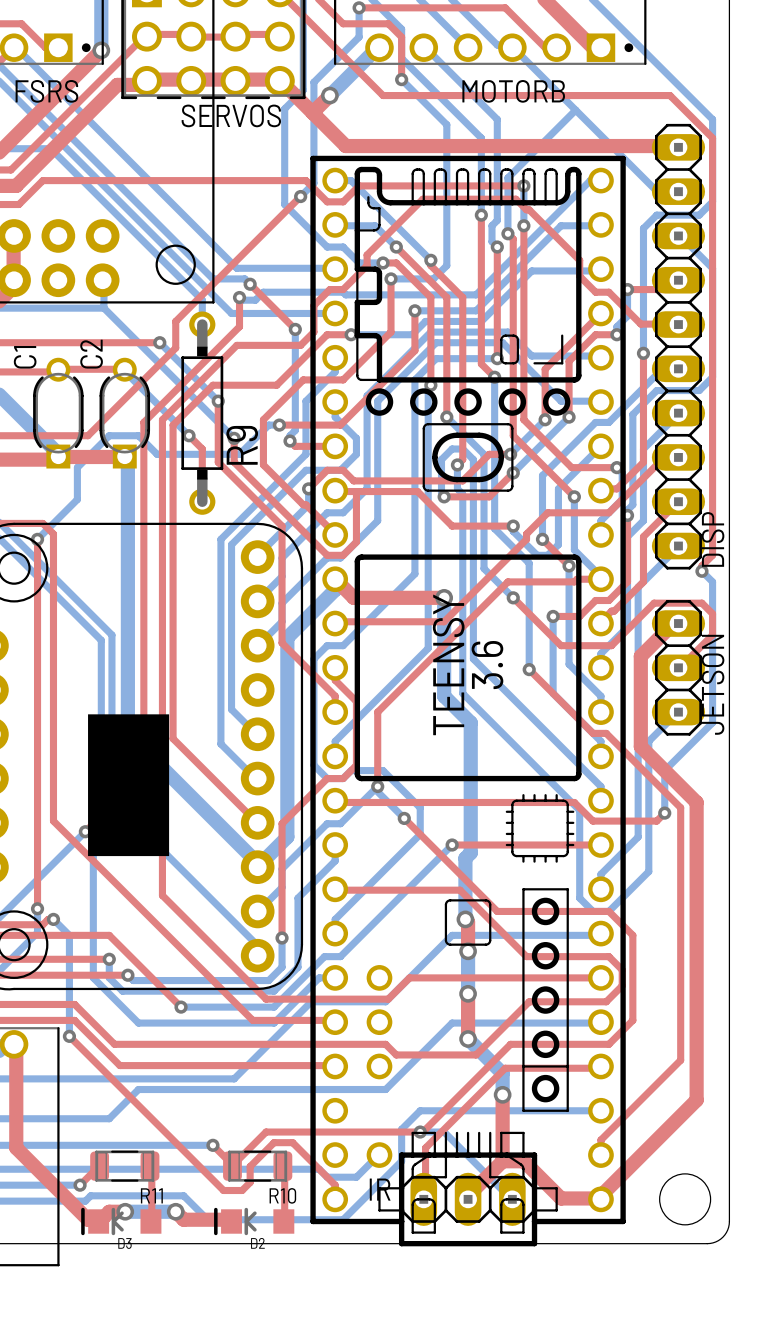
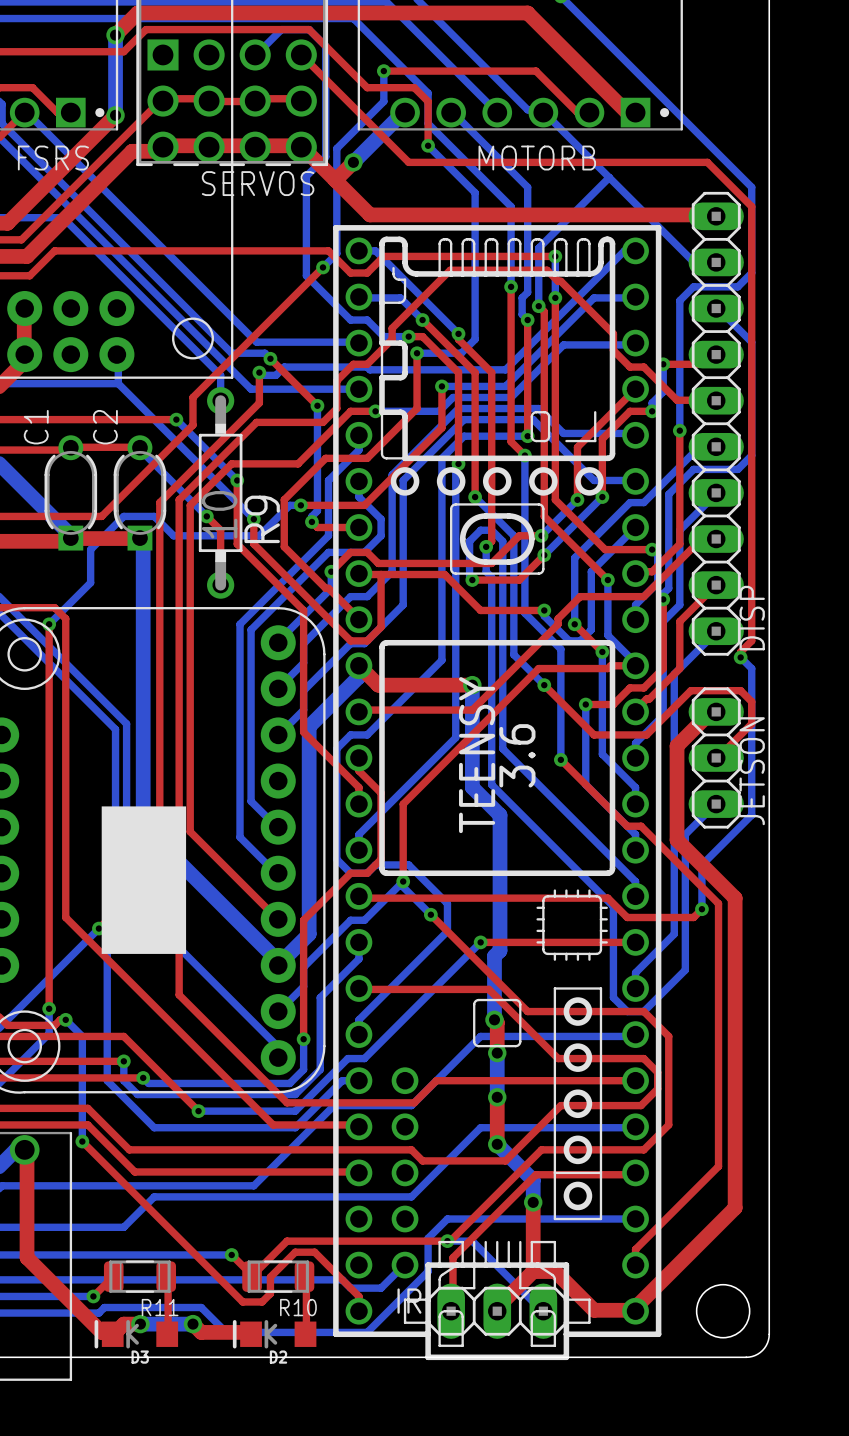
part footprint: [310, 155, 626, 1247] -> [333, 225, 662, 1361]
R9 value: none -> 10 (219, 514)

